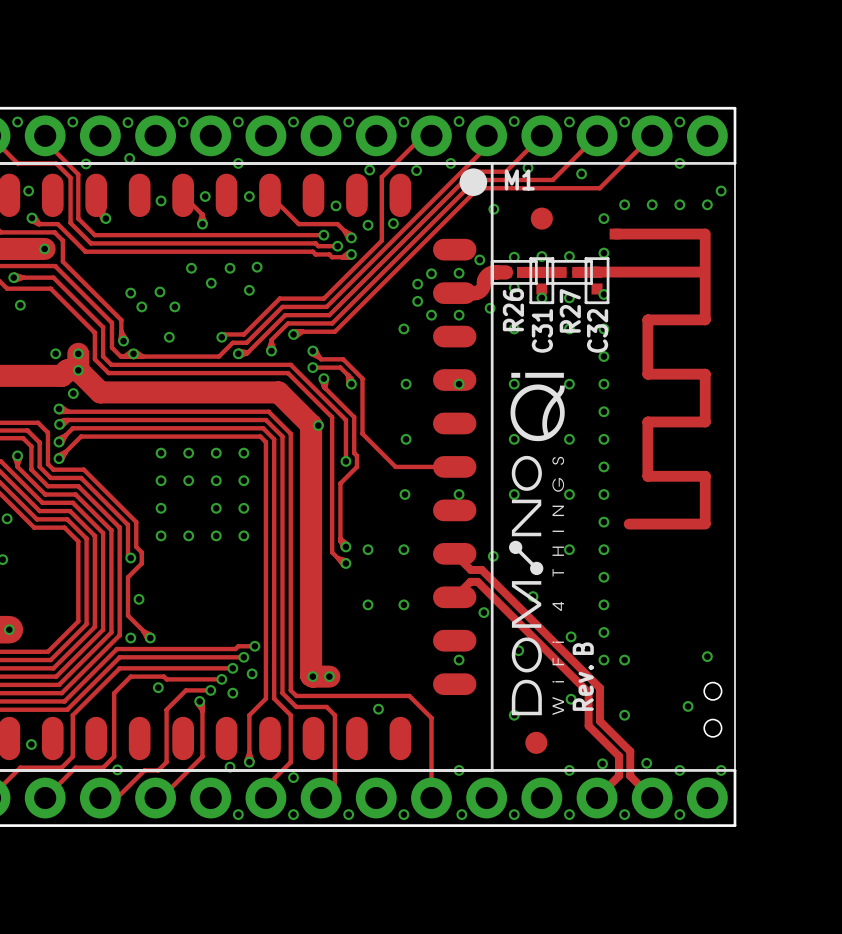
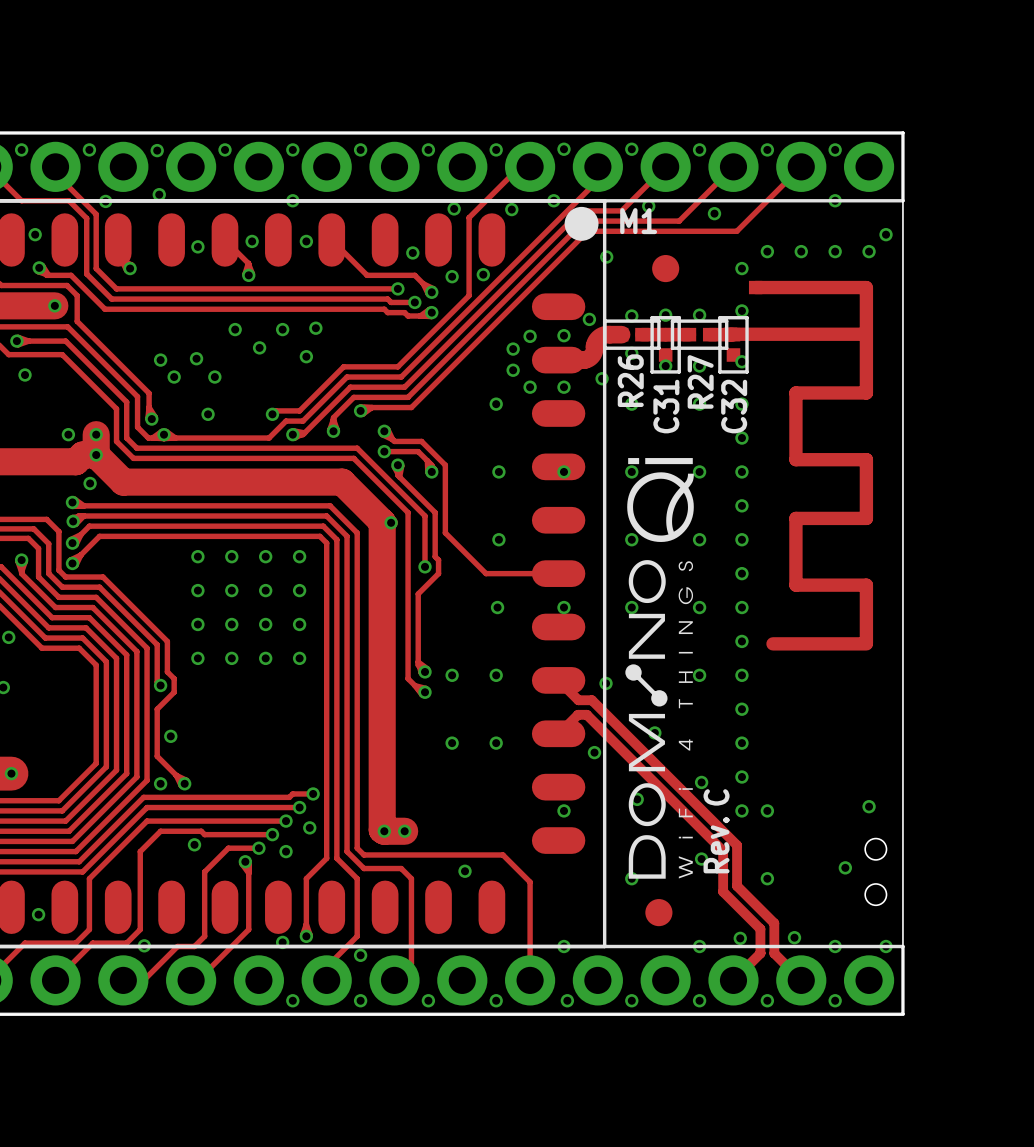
via: none -> (231, 624)
text: B (583, 648) -> C (716, 797)

